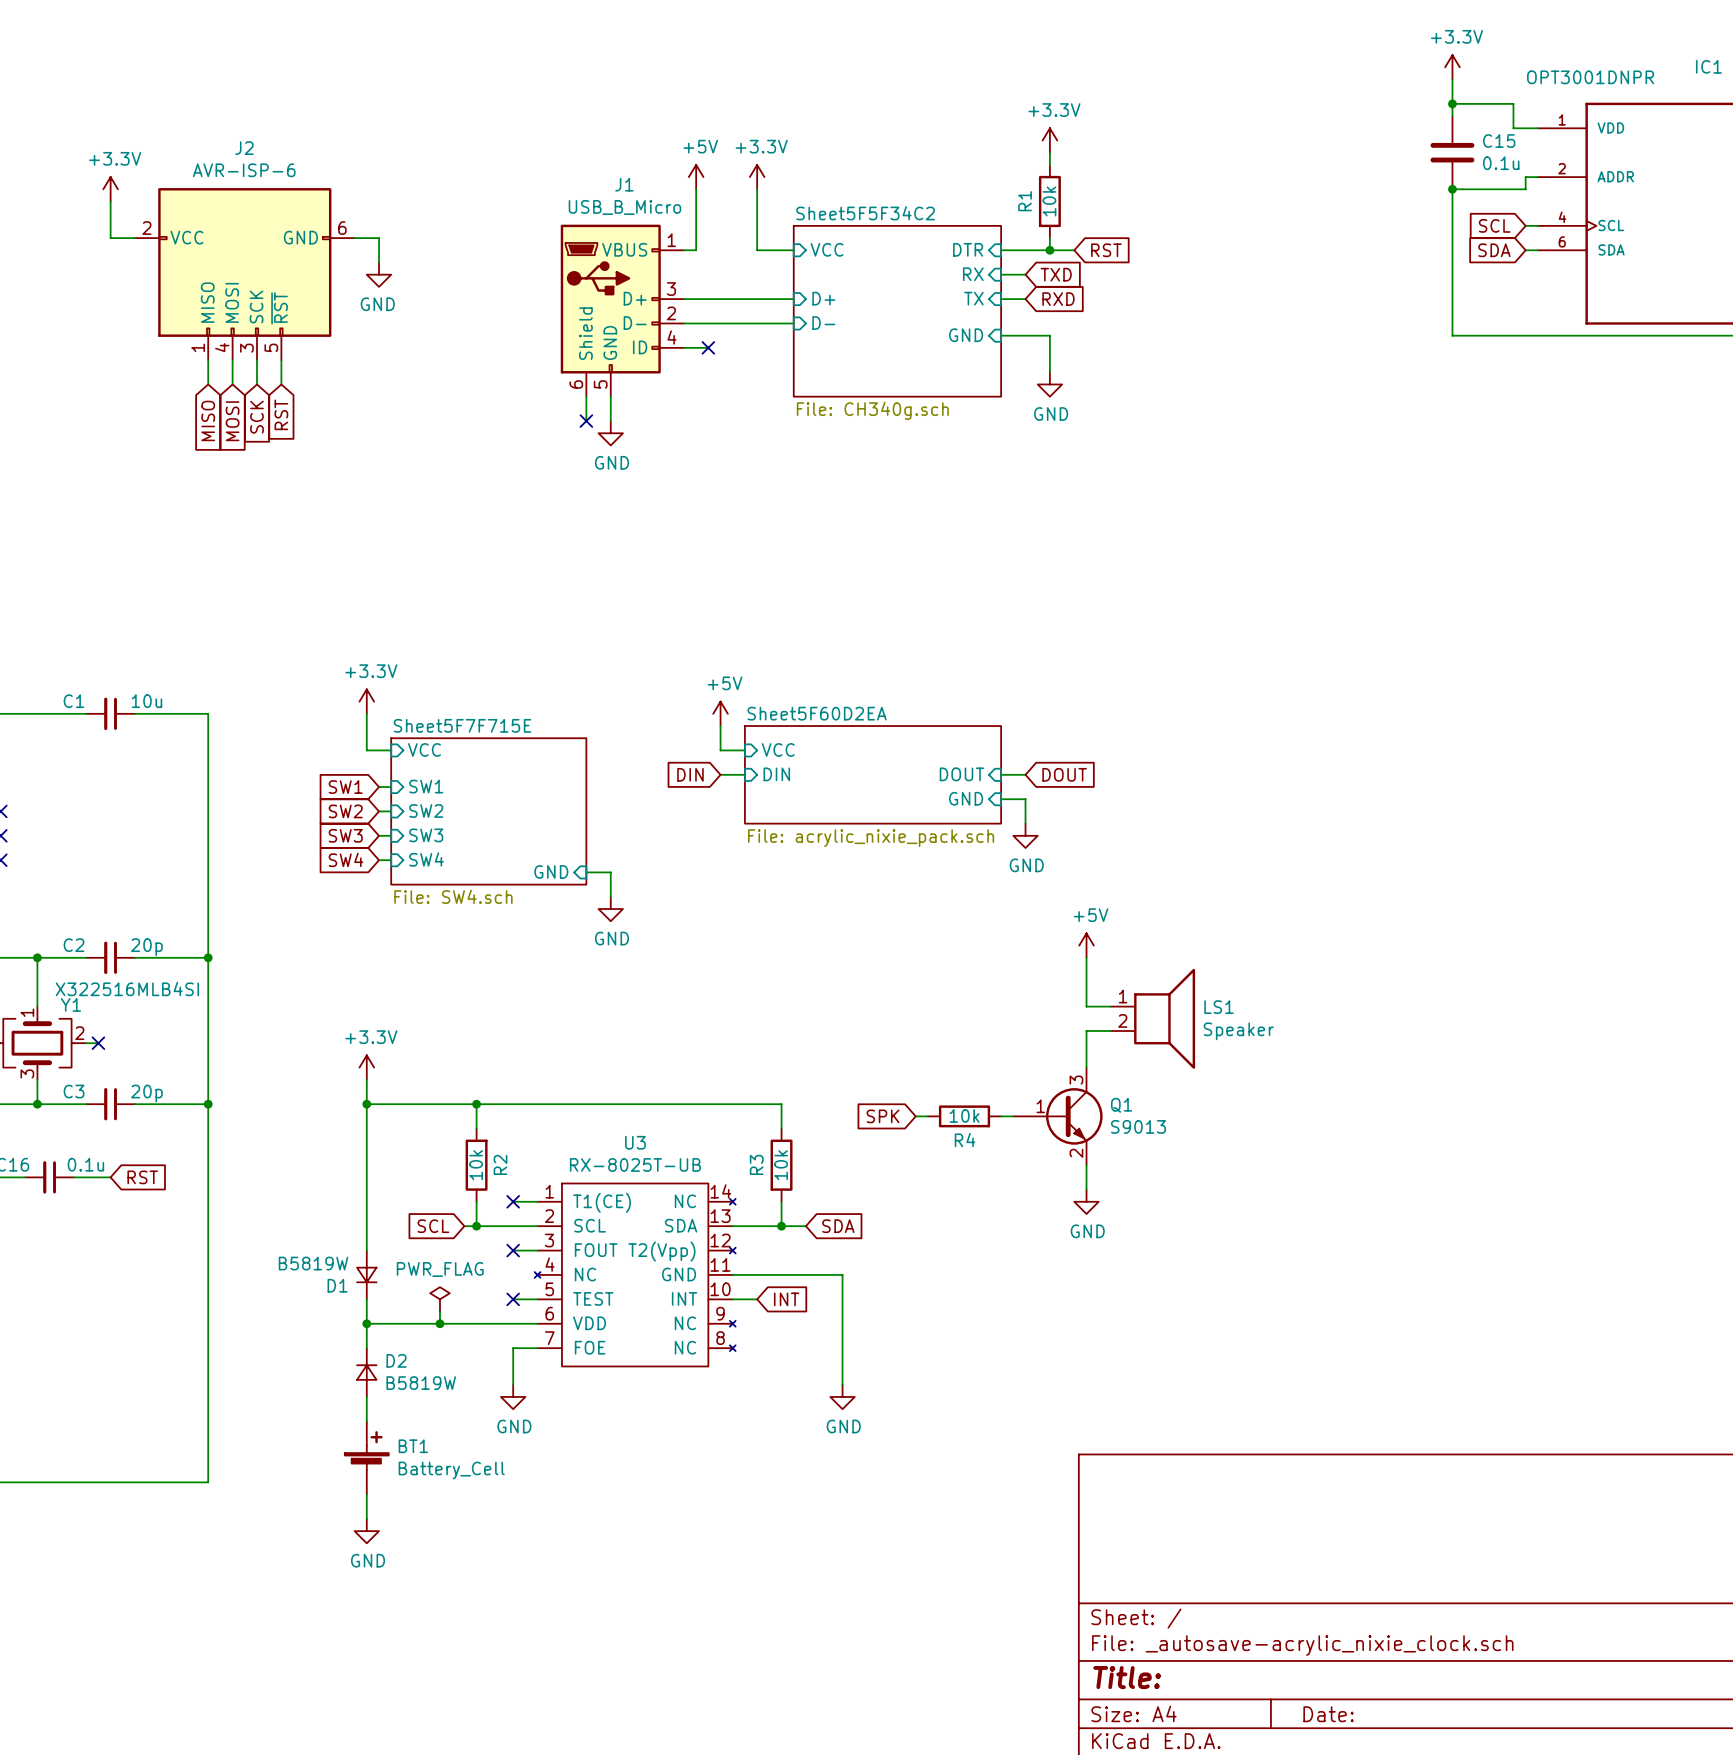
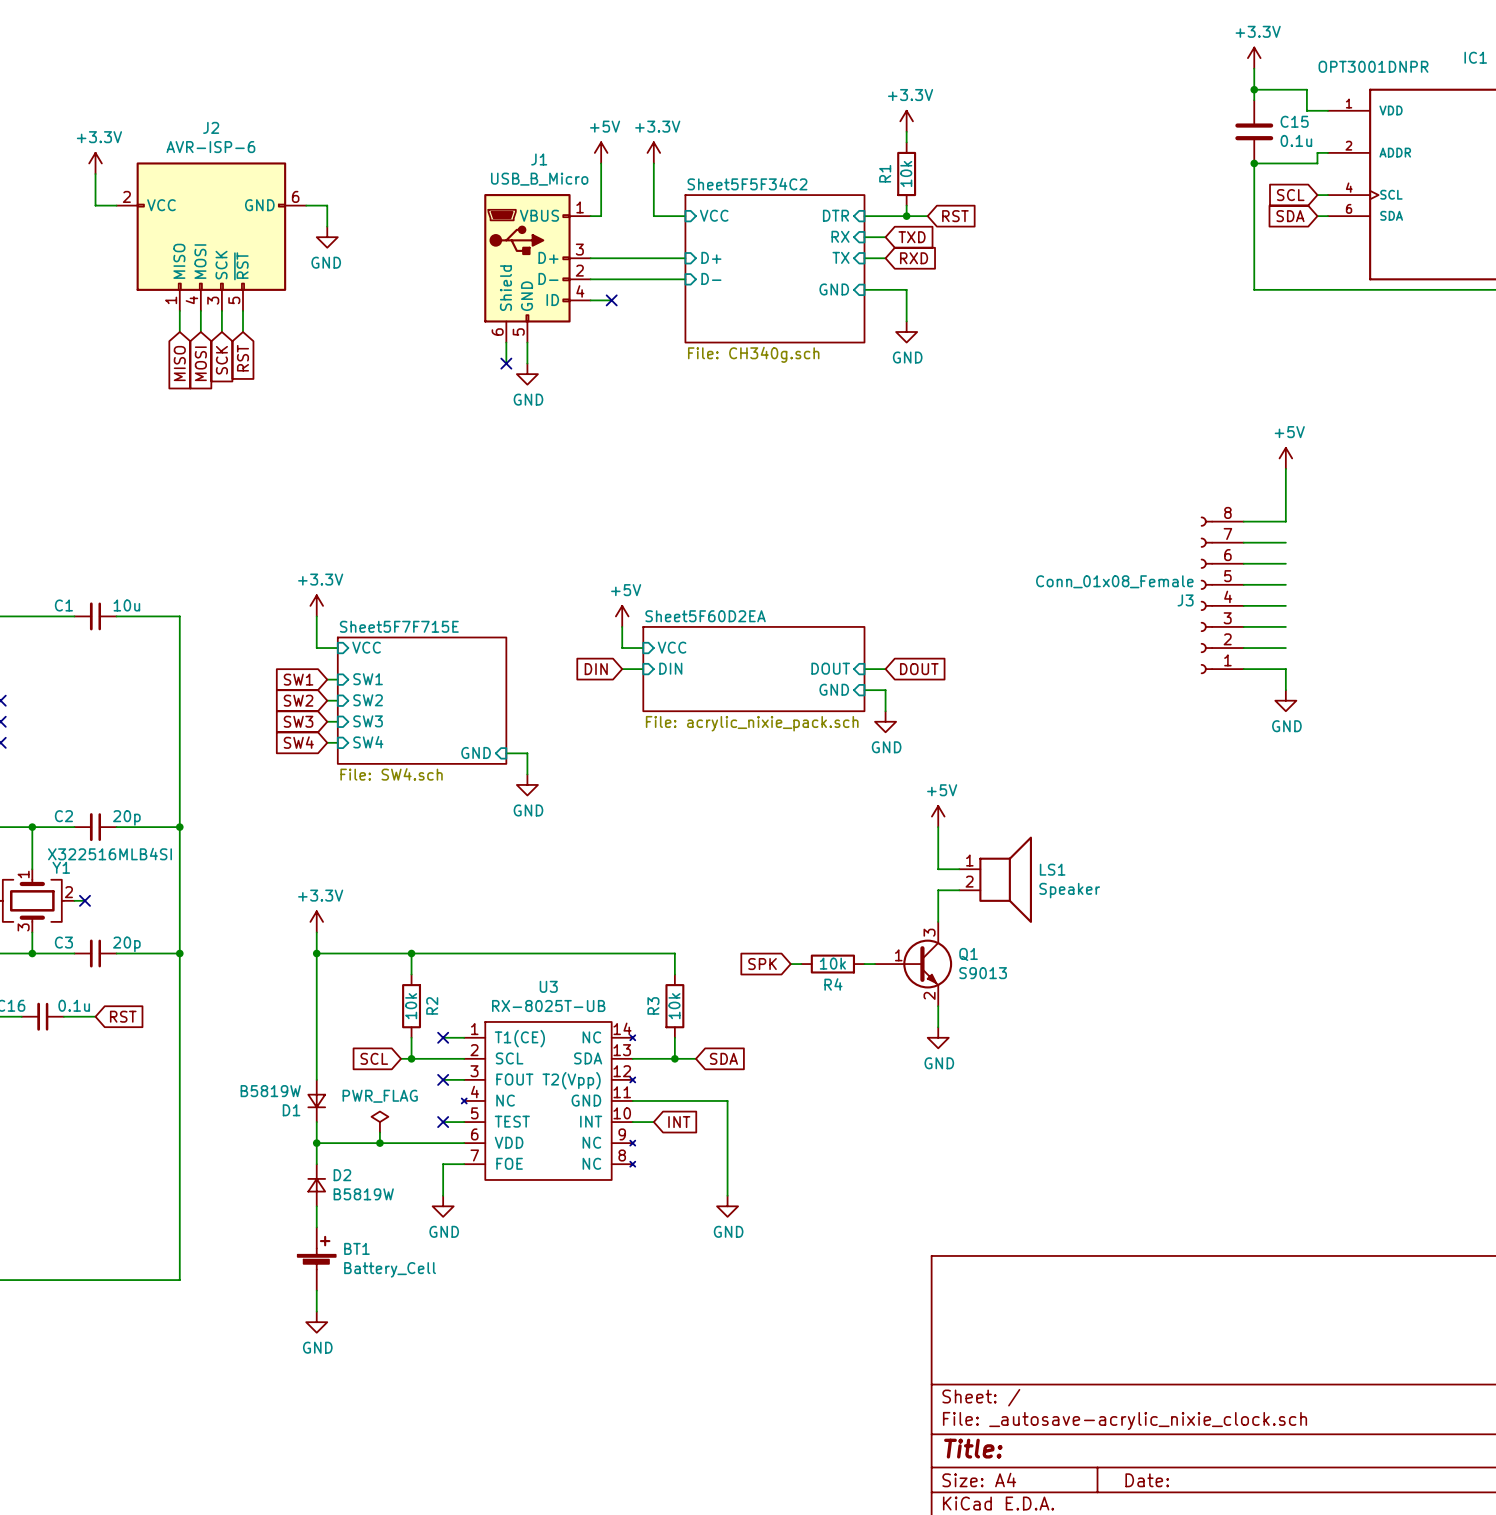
power symbol: none -> +5V (1285, 458)
wire: none -> (1285, 468) (1285, 521) (1243, 521)
wire: none -> (1243, 542) (1285, 542)
wire: none -> (1243, 563) (1285, 563)
wire: none -> (1243, 584) (1285, 584)
J3: none -> Conn_01x08_Female (1222, 595)
wire: none -> (1243, 605) (1285, 605)
wire: none -> (1243, 626) (1285, 626)
wire: none -> (1243, 648) (1285, 648)
wire: none -> (1243, 669) (1285, 669) (1285, 690)
power symbol: none -> GND (1285, 700)

